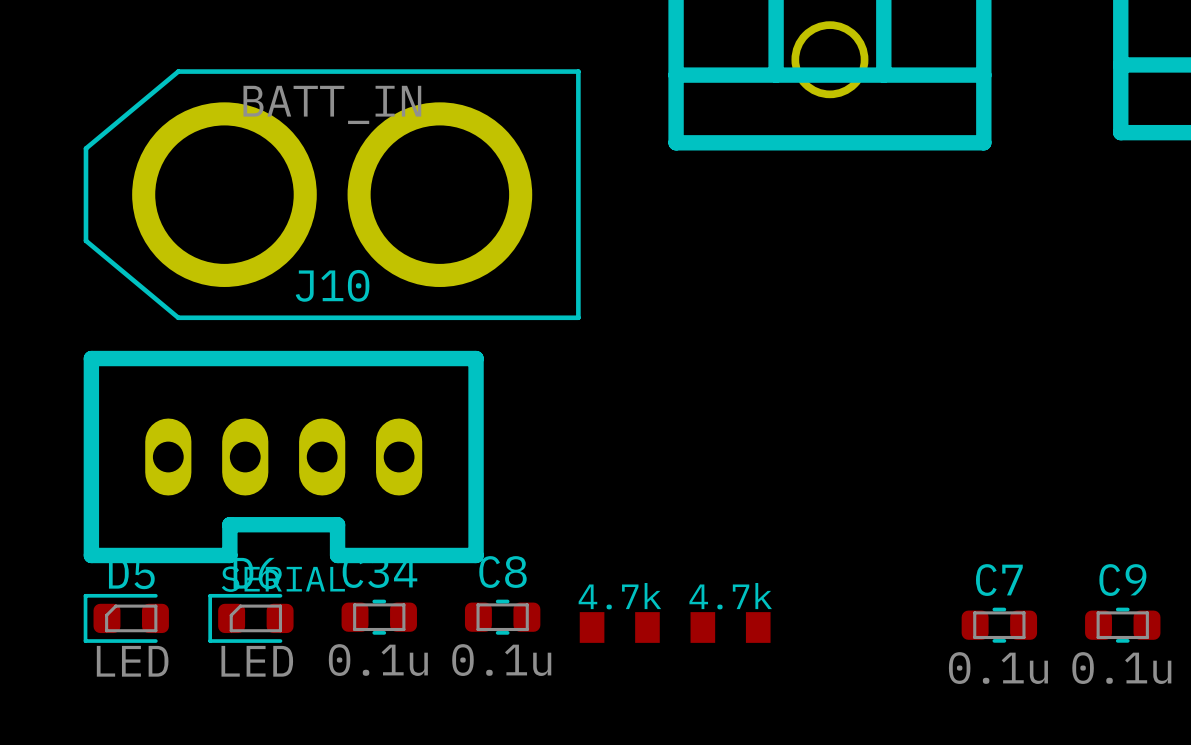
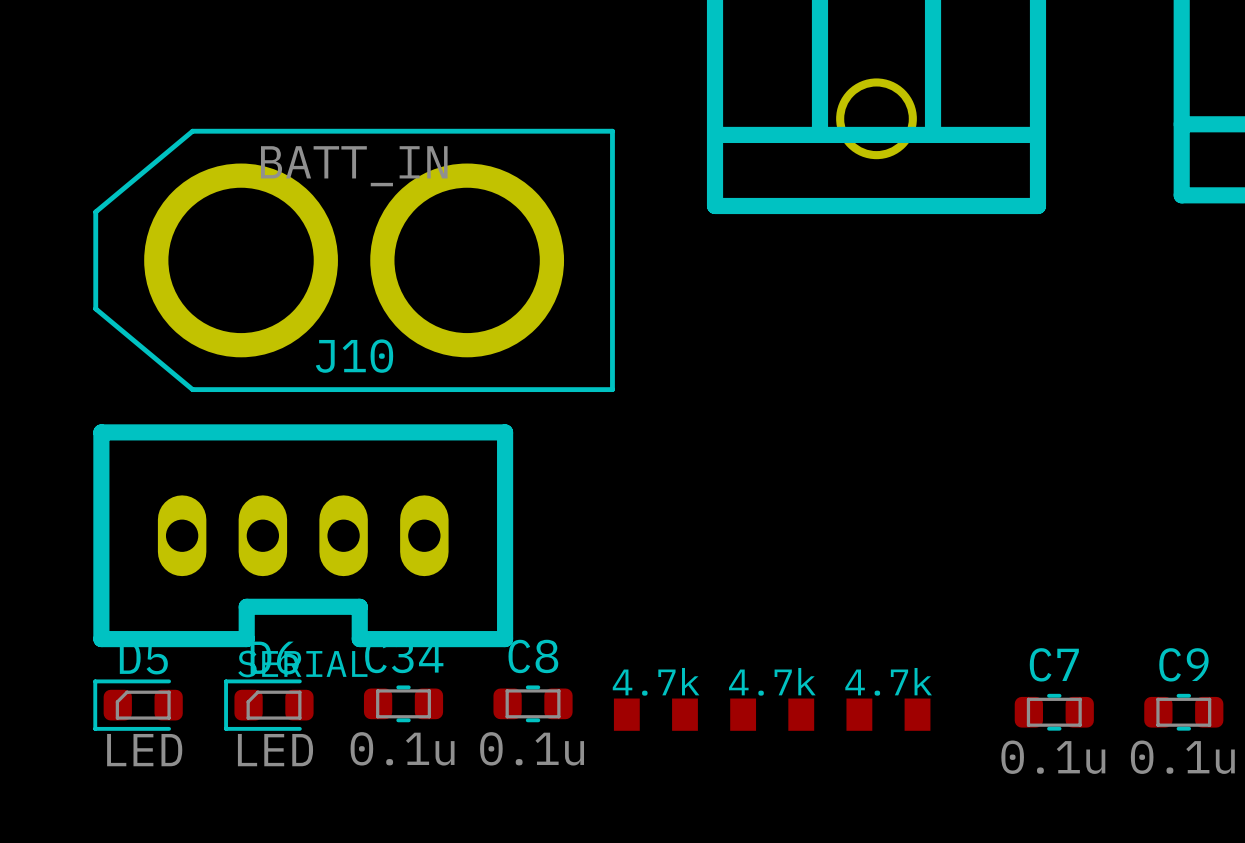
part: none -> 4.7k (888, 714)

